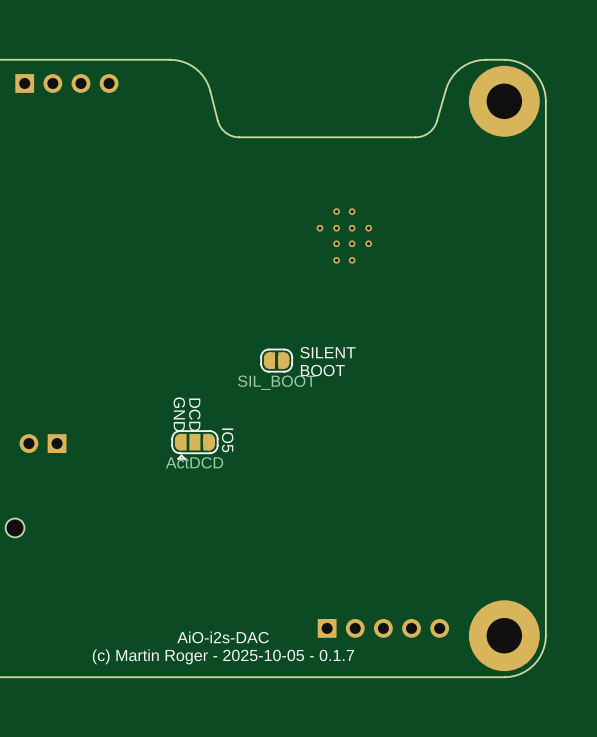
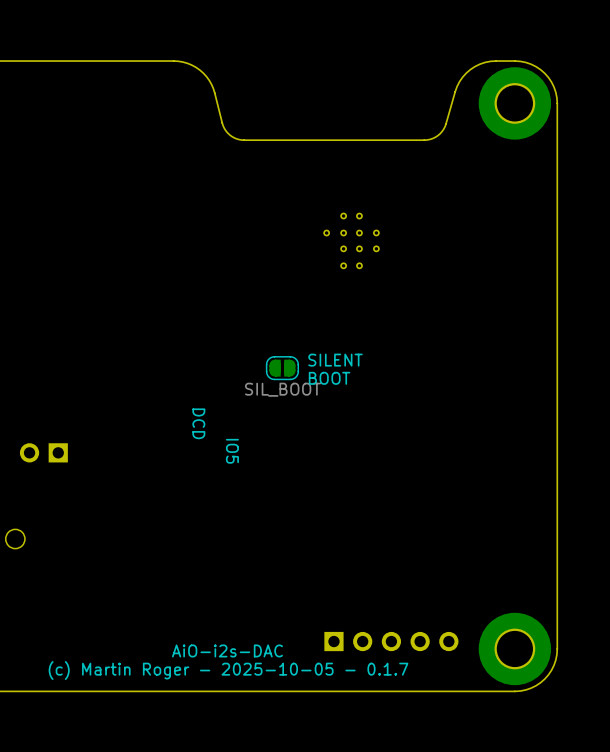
part: (66, 83) -> none
text: GND (179, 414) -> none
part: ActDCD (194, 444) -> none

